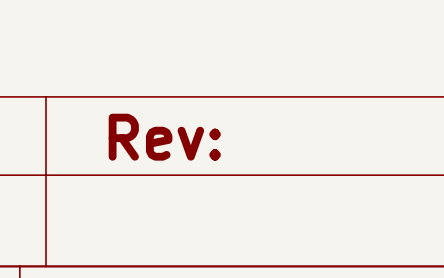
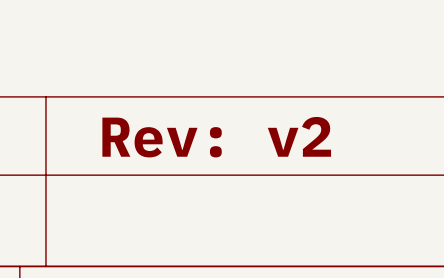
title block: Rev: (164, 137) -> Rev: v2 (216, 137)

